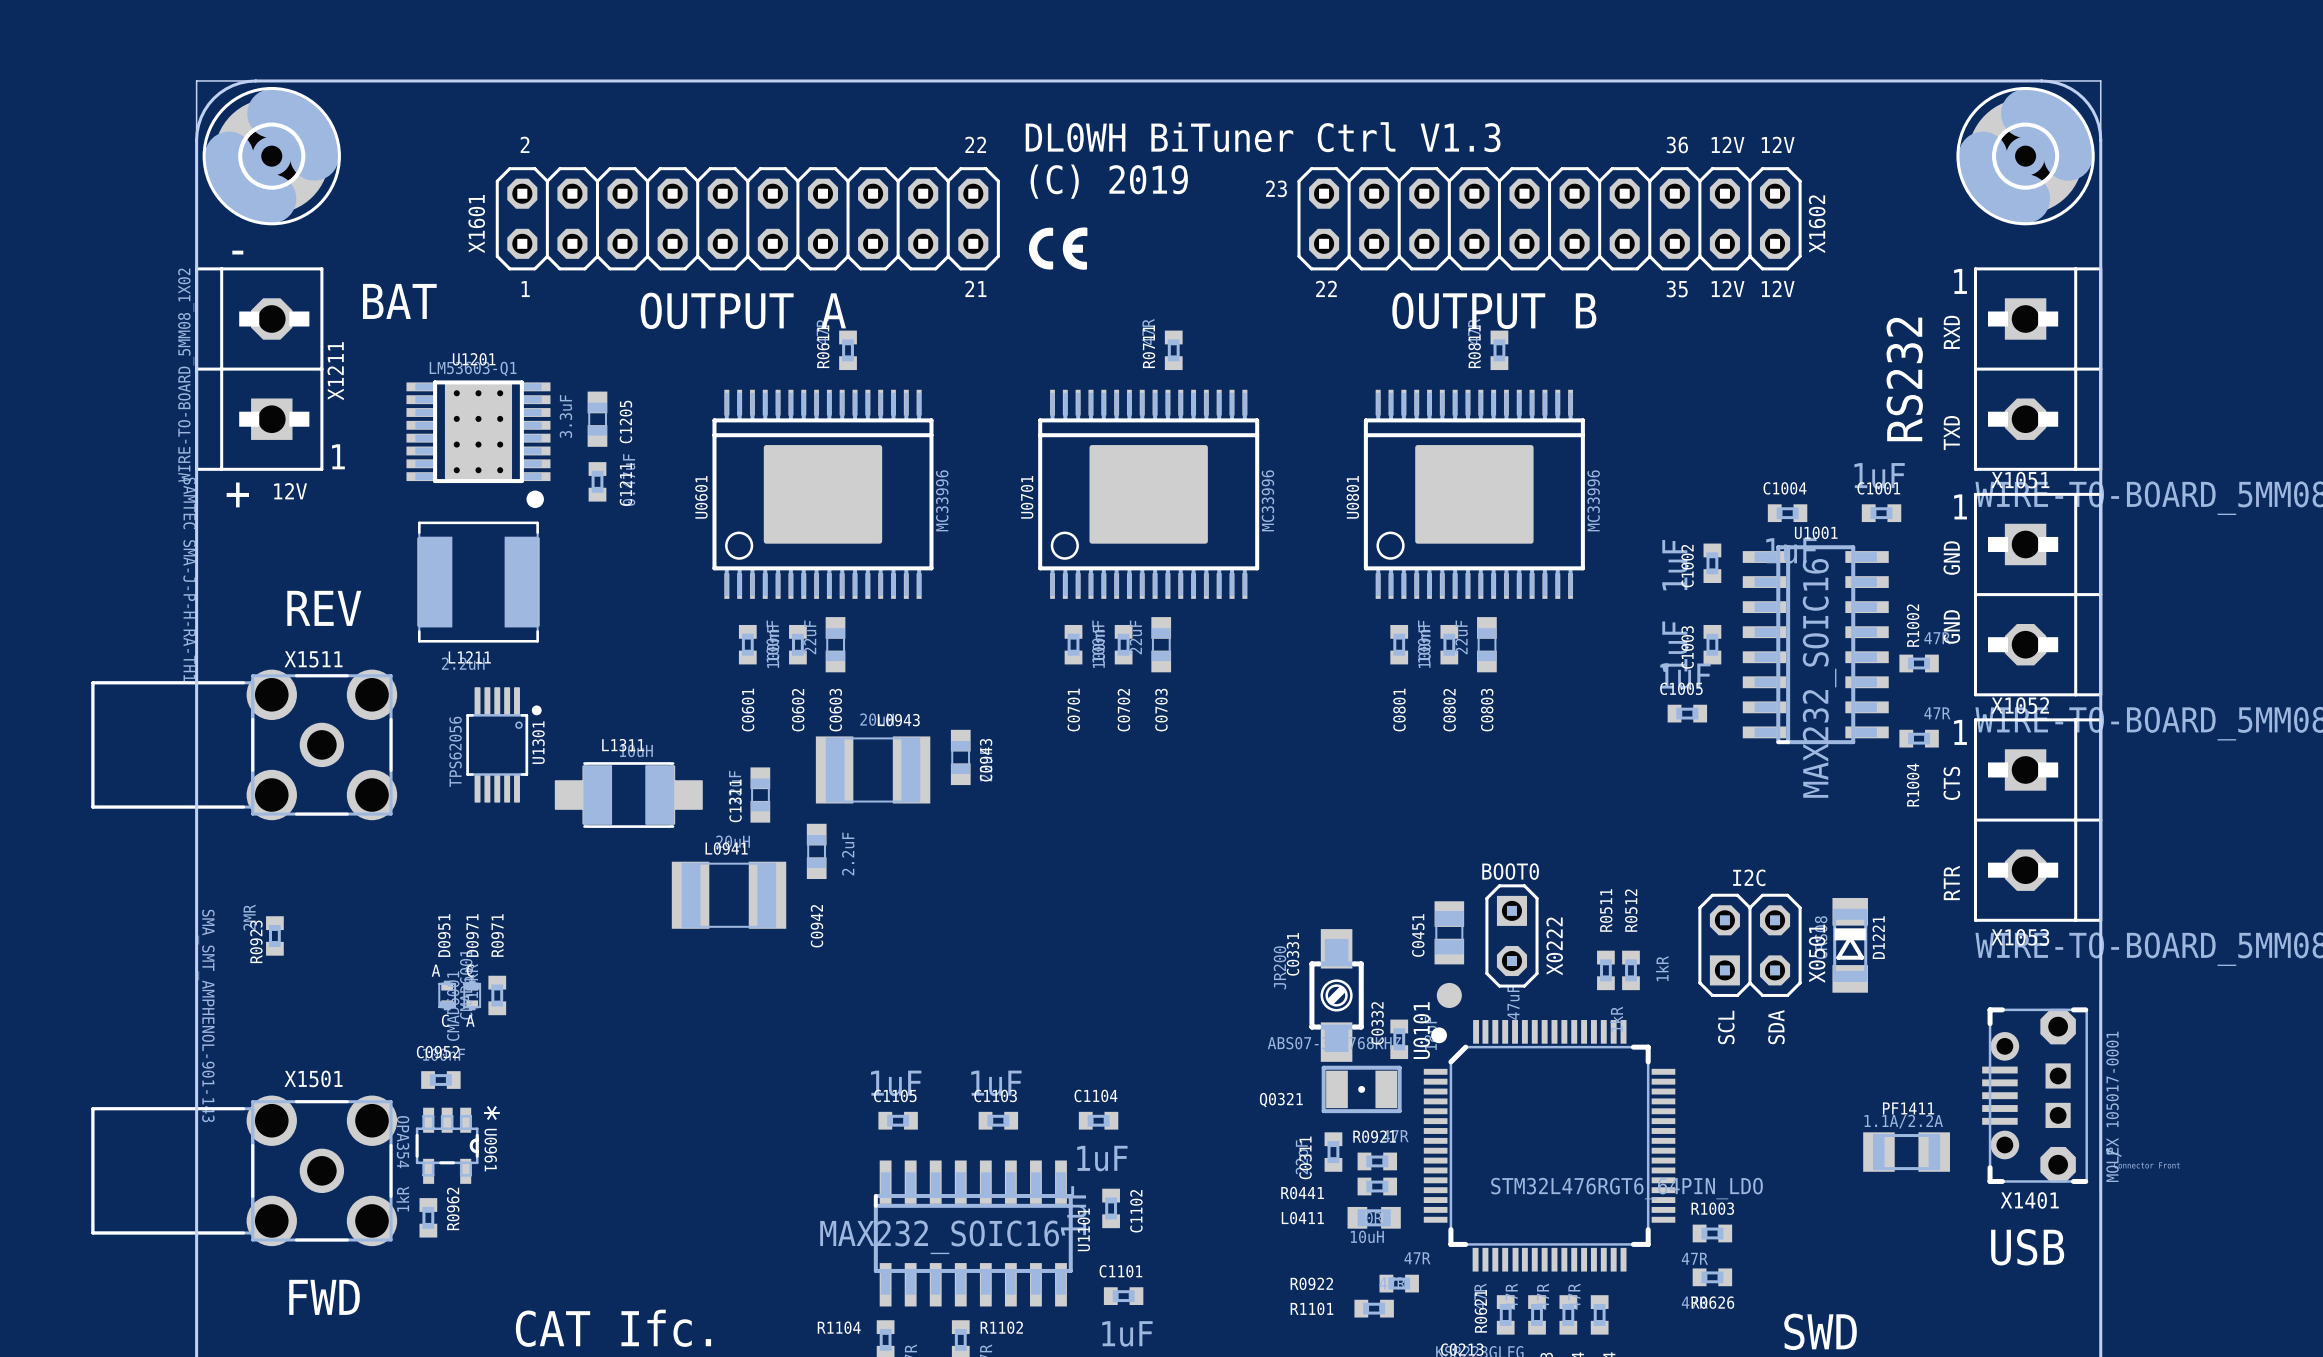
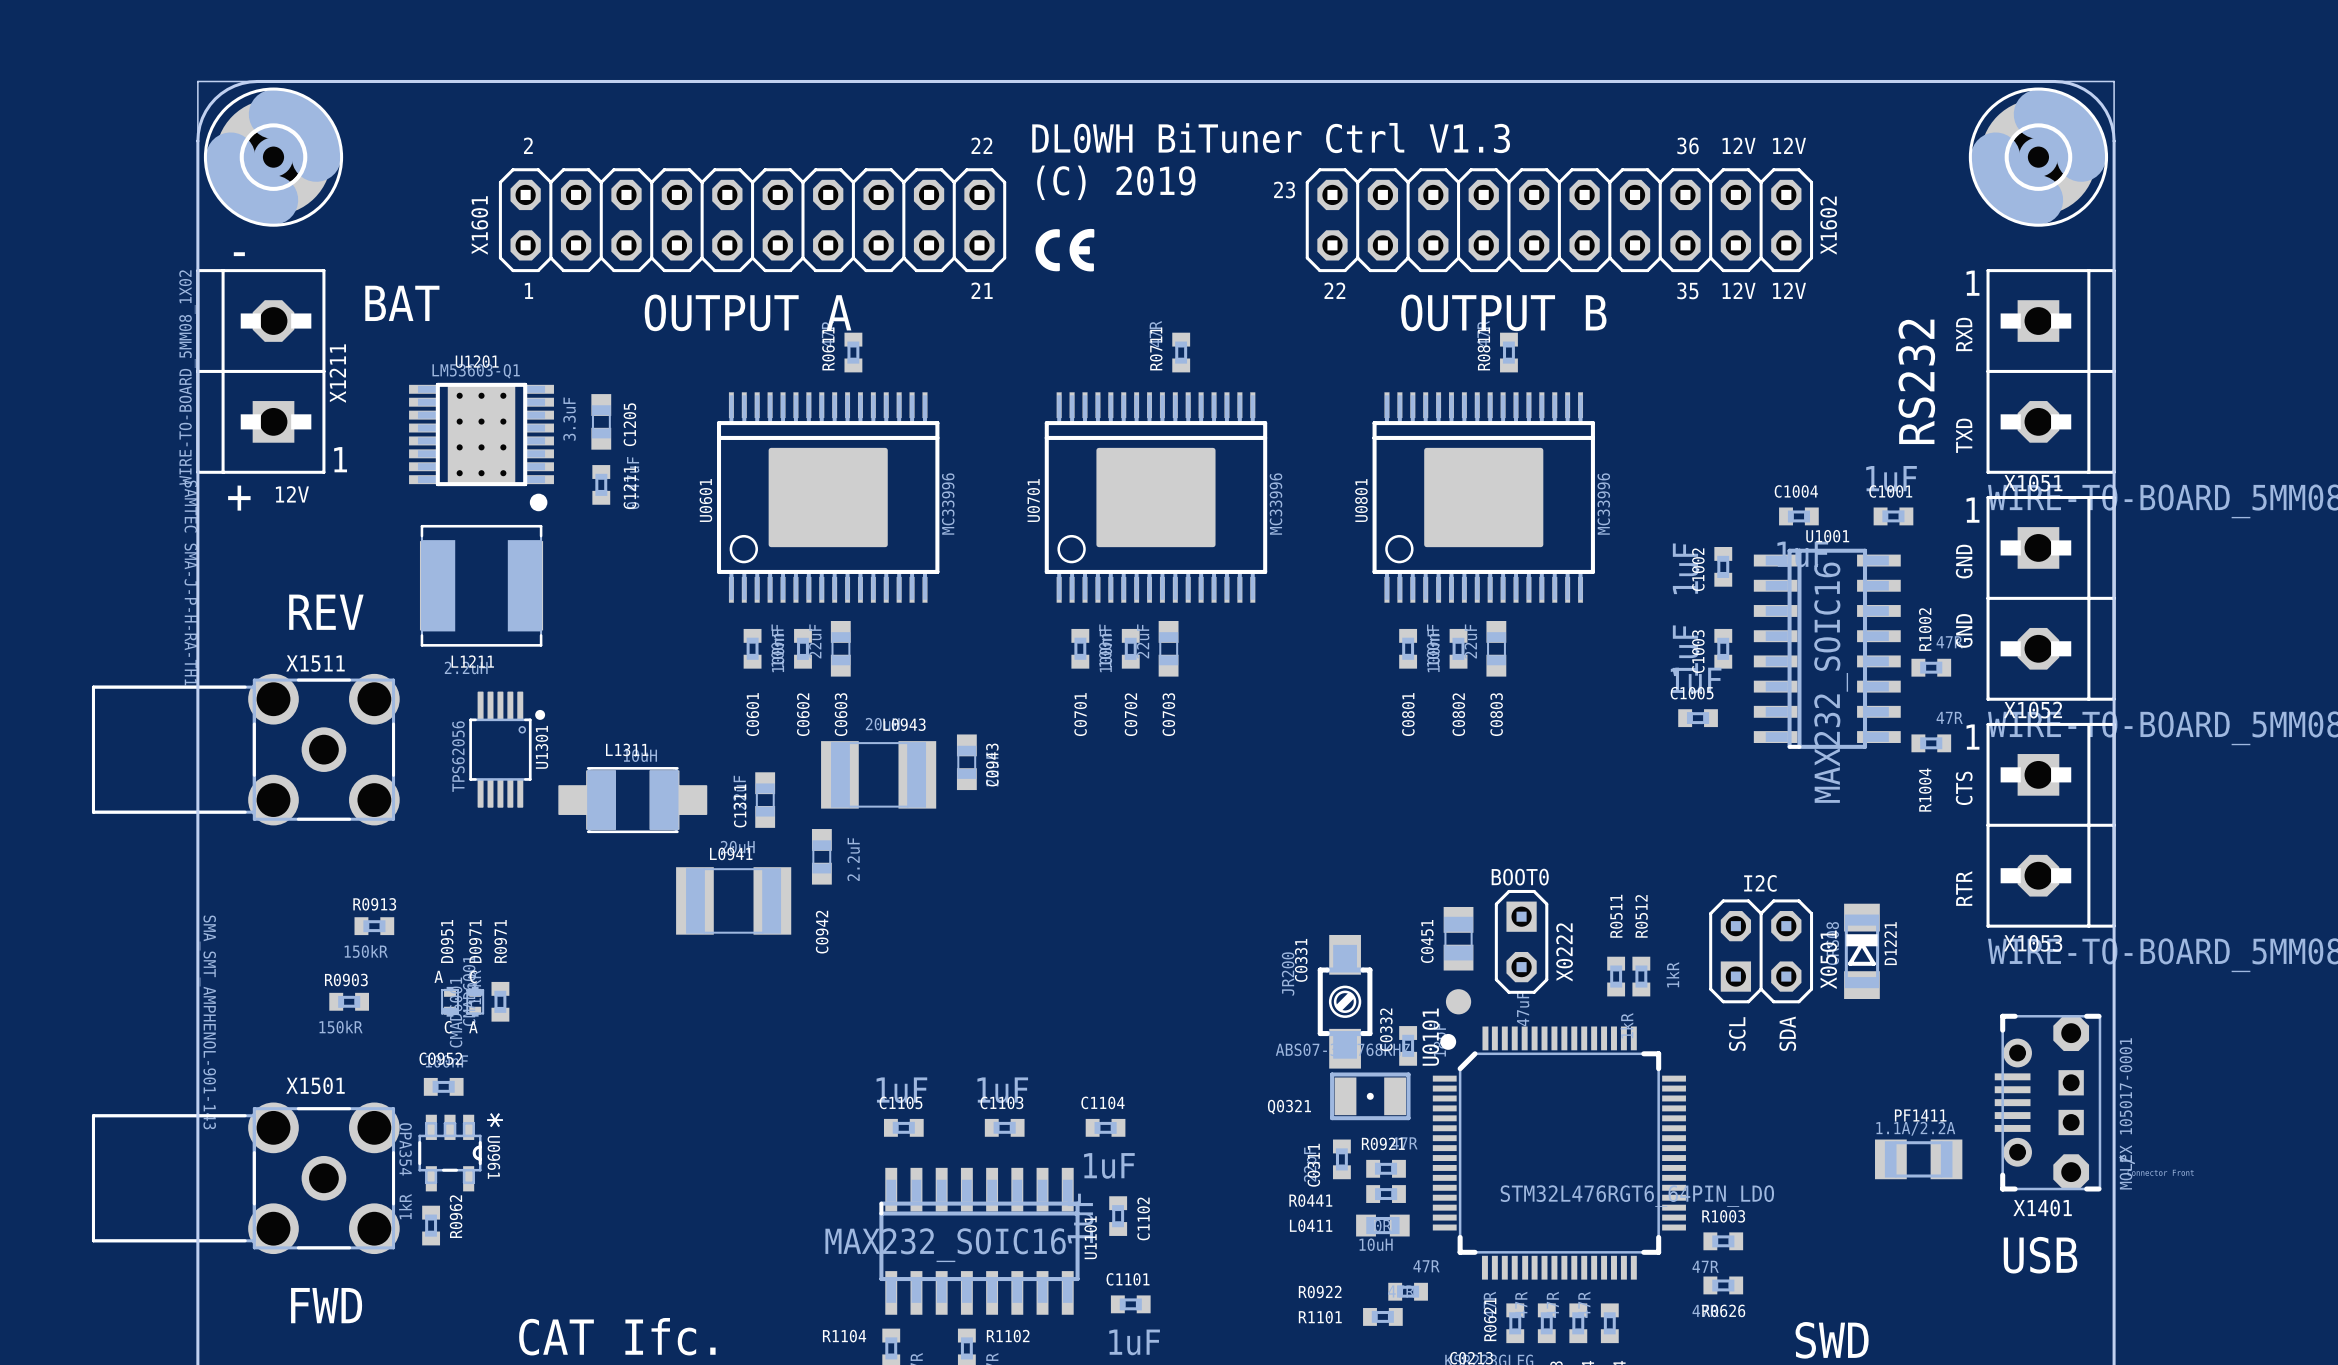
R0913: none -> 150kR (374, 926)
R0923: 2MR (274, 935) -> none
R0903: none -> 150kR (349, 1001)

